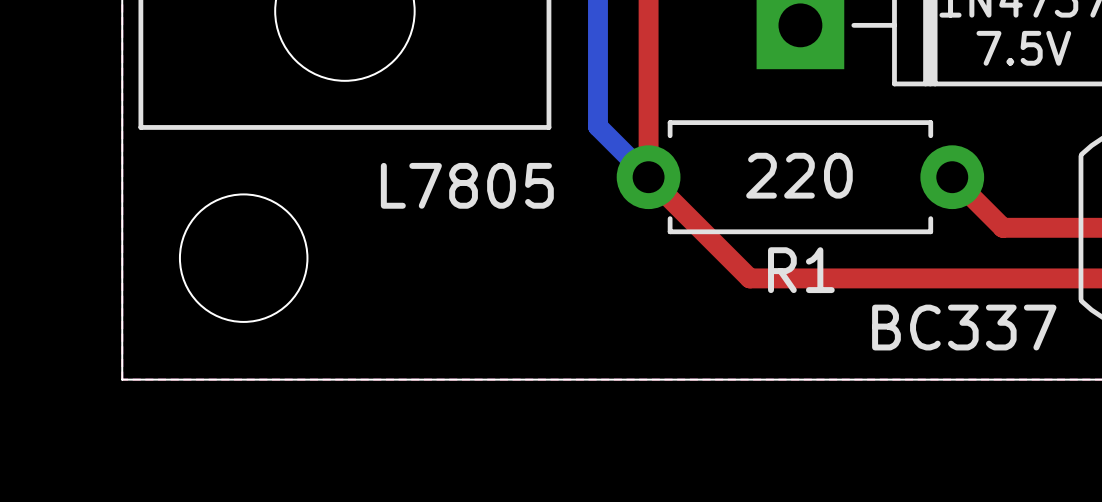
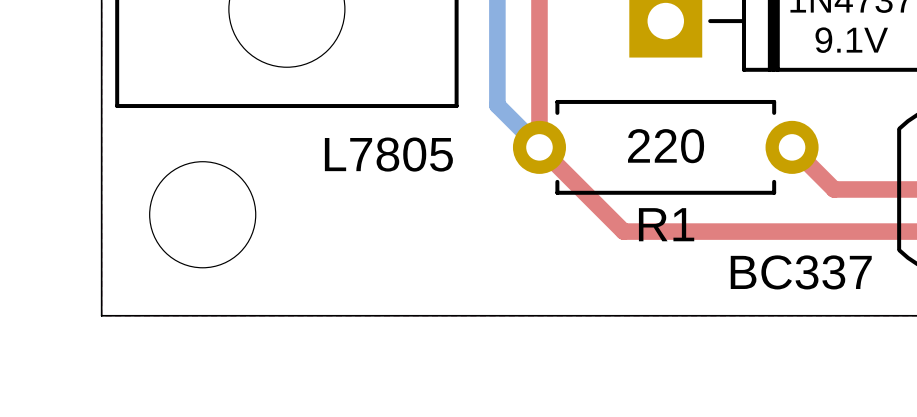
text: 7.5V (1023, 48) -> 9.1V (851, 40)

